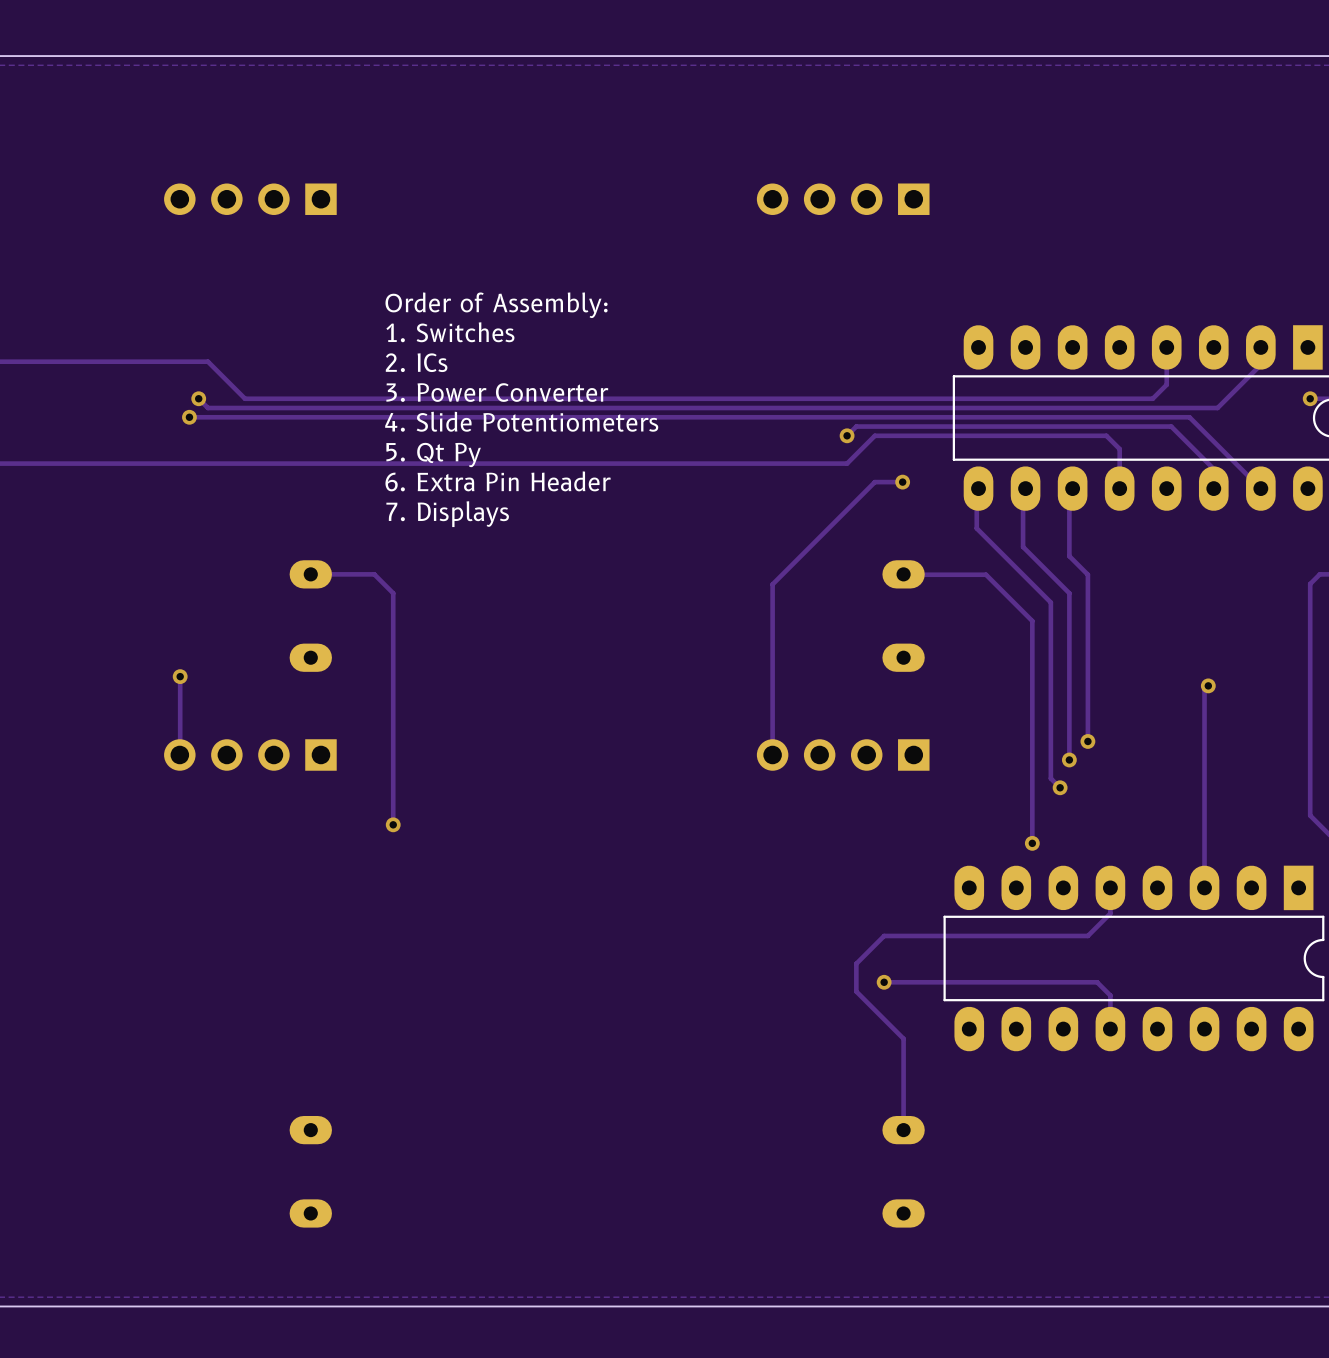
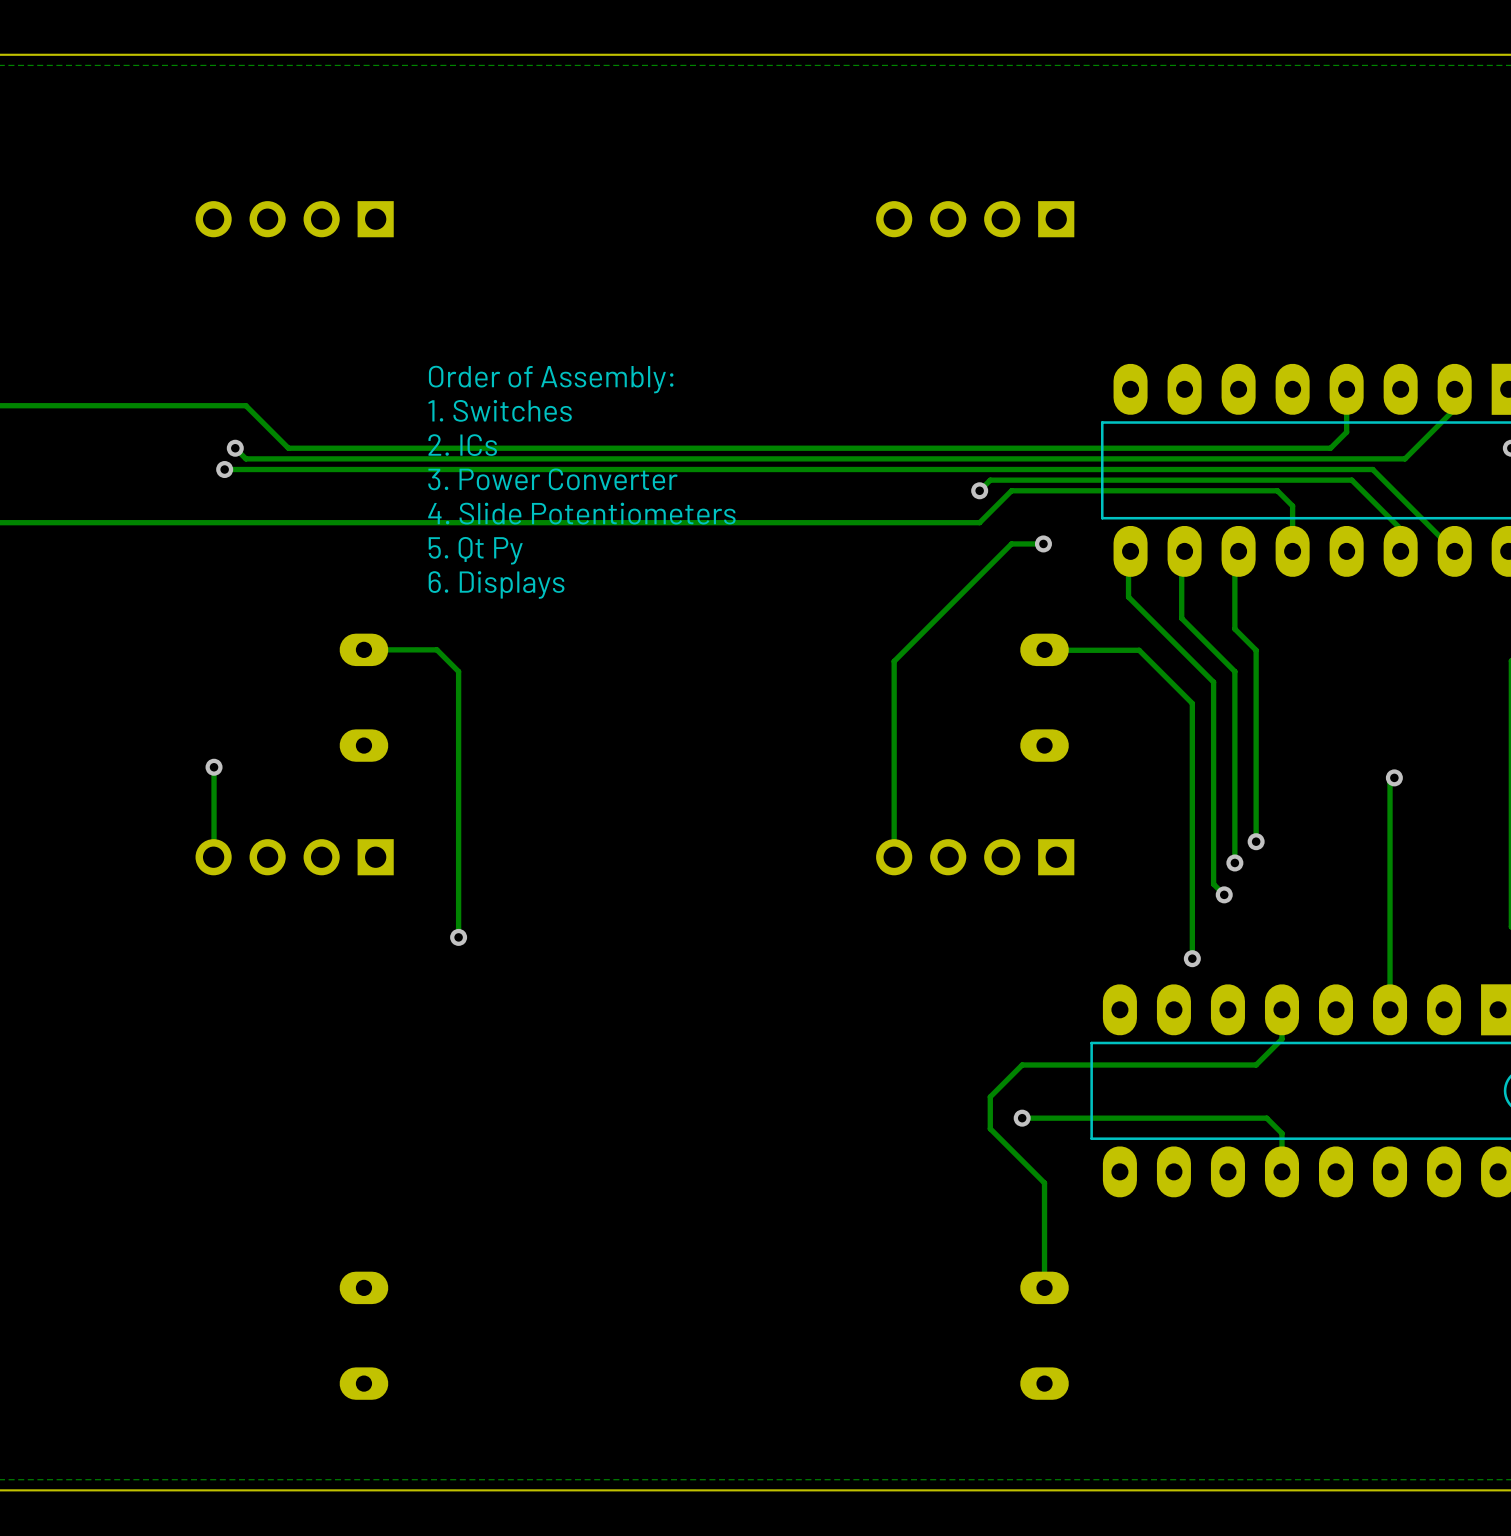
text position: Order of Assembly: (496, 305) -> Order of Assembly: (551, 379)
text position: 1. Switches (450, 332) -> 1. Switches (500, 410)
text position: 2. ICs (416, 362) -> 2. ICs (462, 445)
text position: 3. Power Converter (497, 392) -> 3. Power Converter (552, 479)
text position: 4. Slide Potentiometers (521, 421) -> 4. Slide Potentiometers (581, 513)
text position: 5. Qt Py (433, 455) -> 5. Qt Py (475, 550)
text: 6. Extra Pin Header (498, 481) -> none
text: 7. Displays (447, 514) -> 6. Displays (496, 584)

